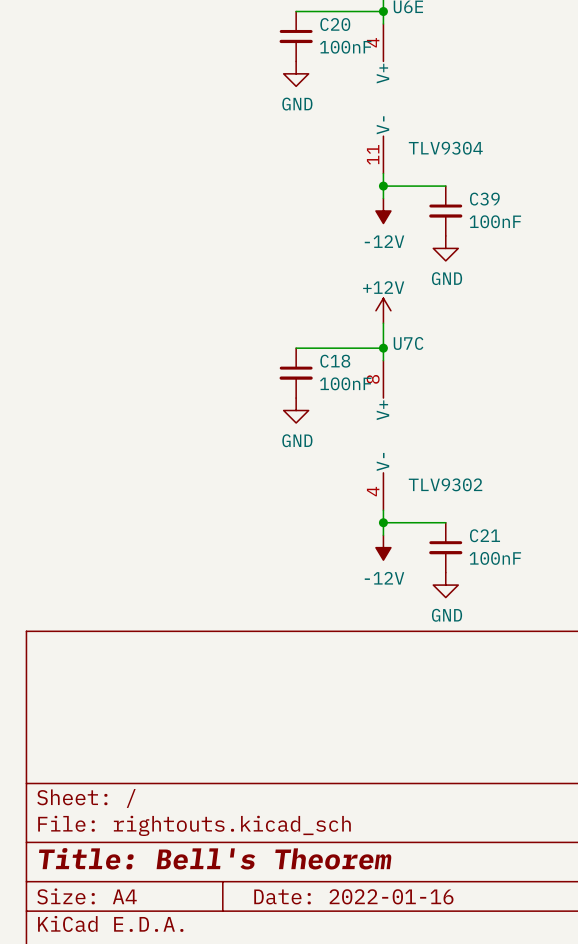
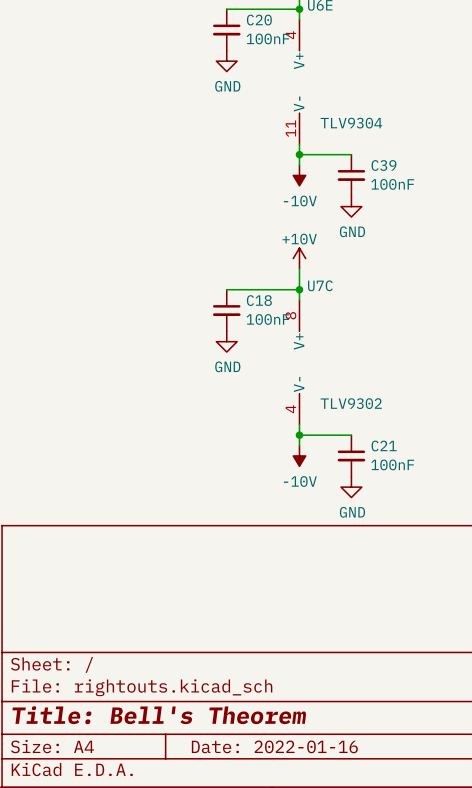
power symbol: -12V (383, 211) -> -10V (299, 175)
power symbol: +12V (383, 310) -> +10V (299, 258)
power symbol: -12V (383, 547) -> -10V (299, 455)

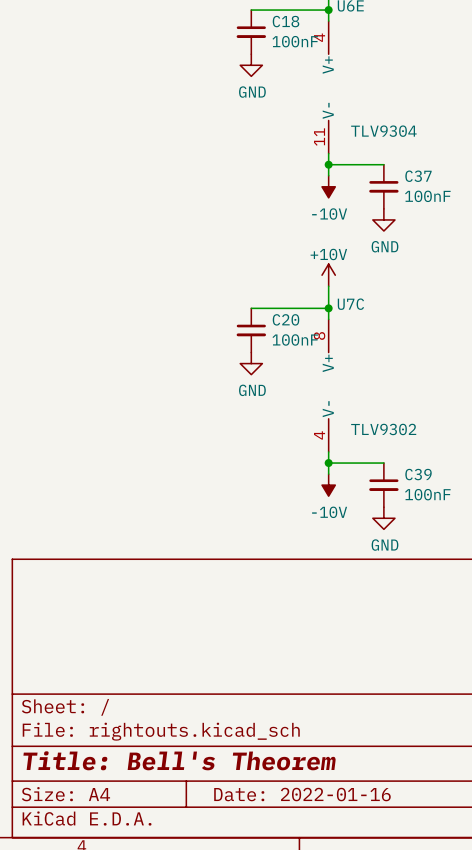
C20 name: C20 (259, 20) -> C18 (286, 21)
C39 name: C39 (383, 165) -> C37 (418, 176)
C18 name: C18 (259, 300) -> C20 (286, 319)
C21 name: C21 (384, 446) -> C39 (418, 474)

